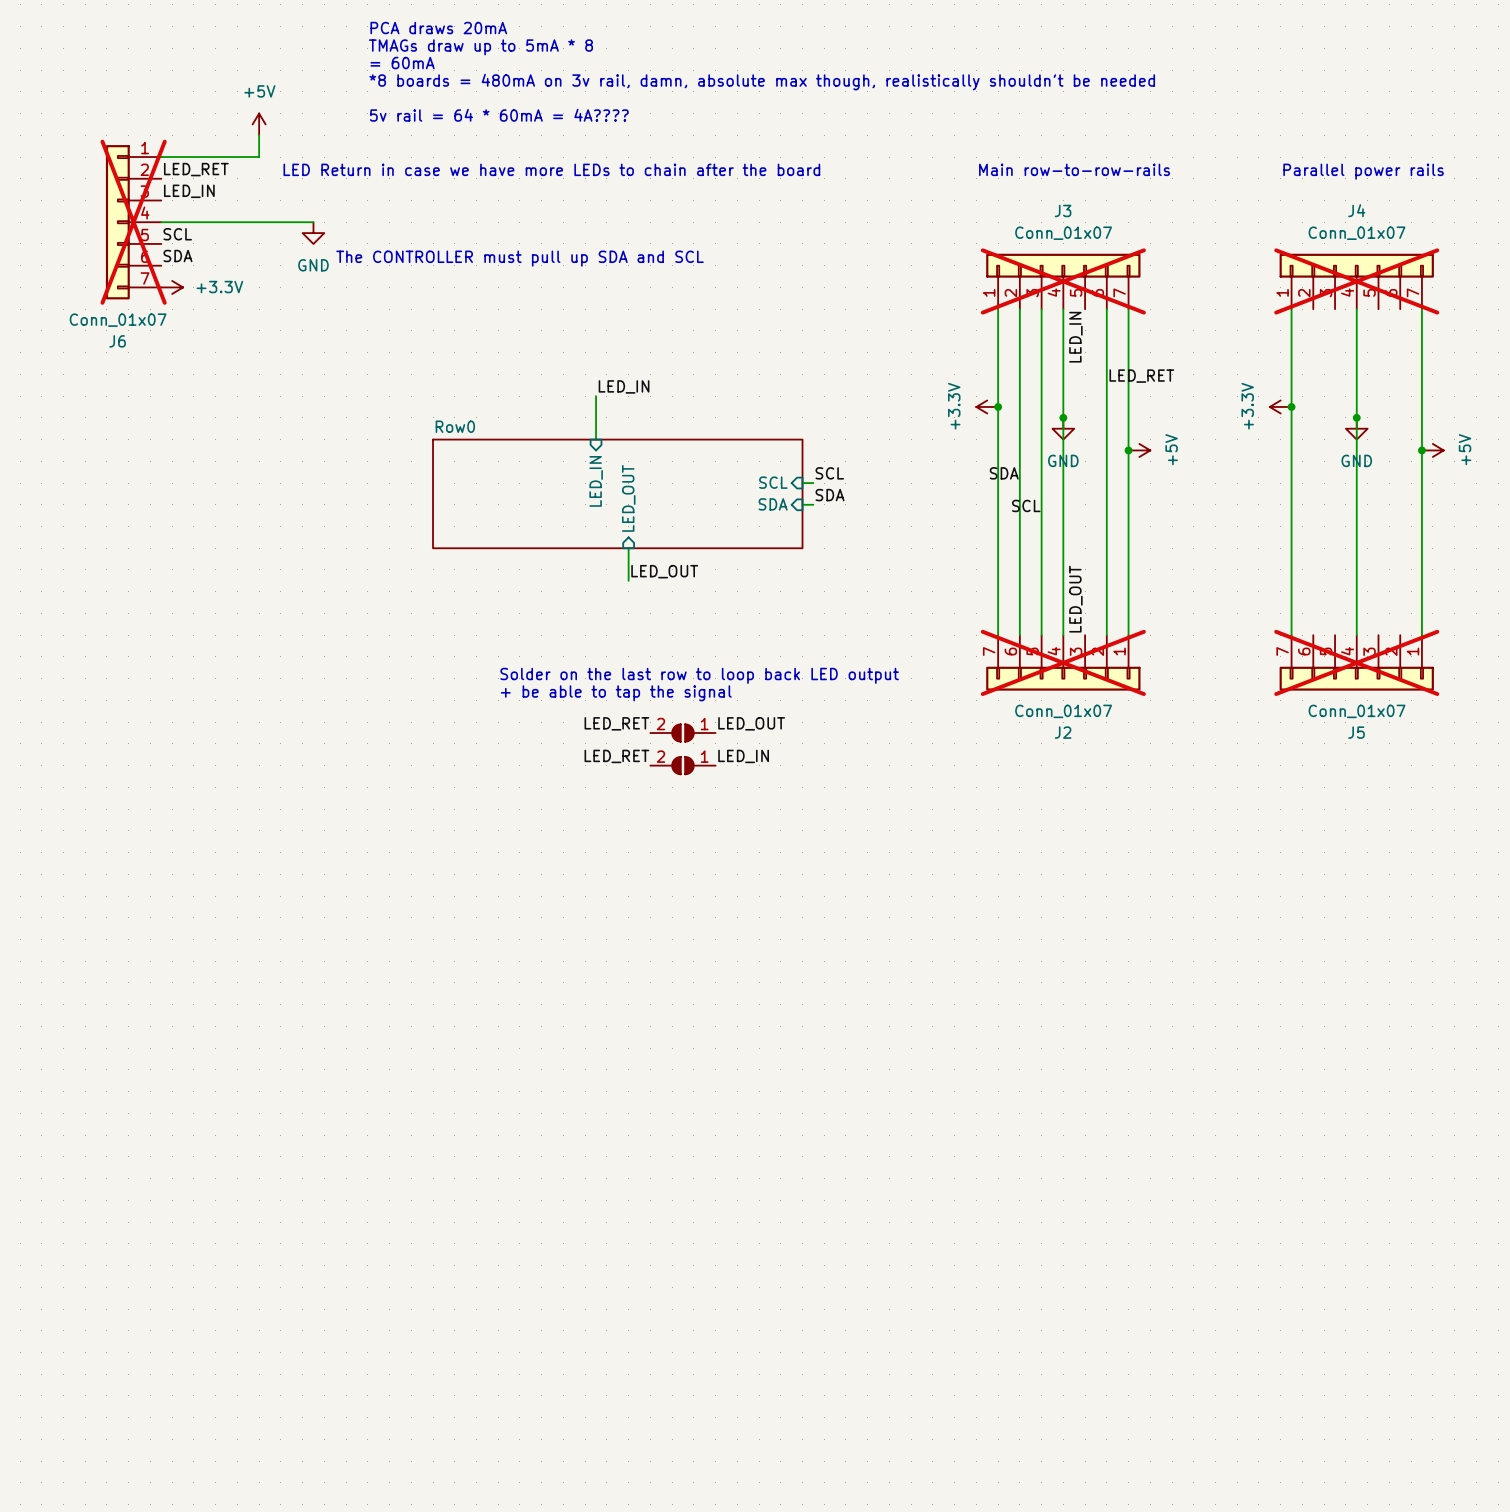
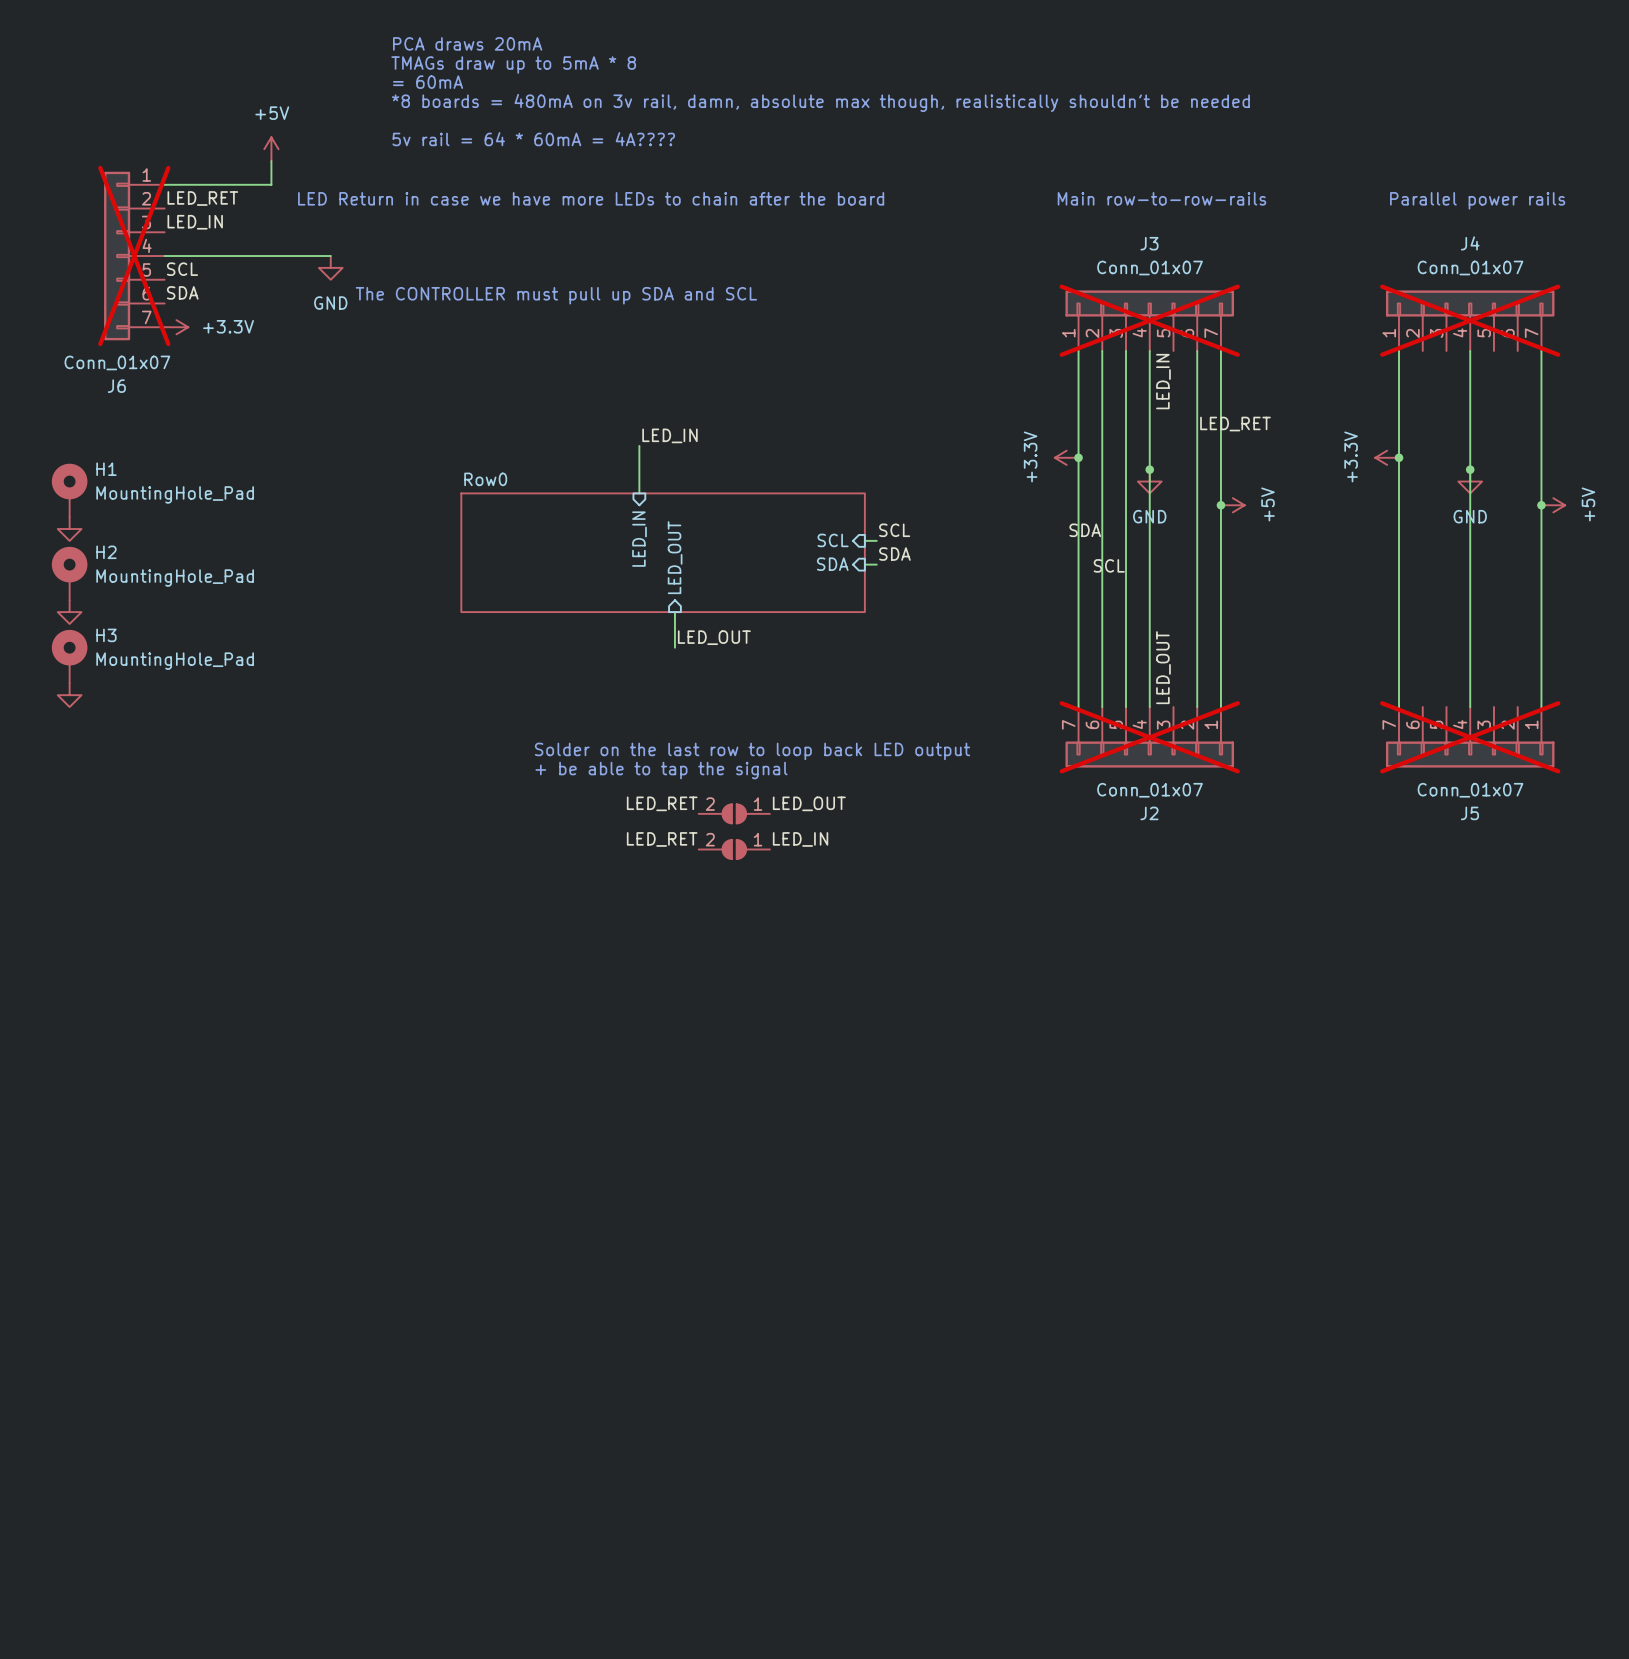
H1: none -> MountingHole_Pad (69, 490)
power symbol: none -> (69, 529)
H2: none -> MountingHole_Pad (69, 573)
power symbol: none -> (69, 612)
H3: none -> MountingHole_Pad (69, 656)
power symbol: none -> (69, 695)

